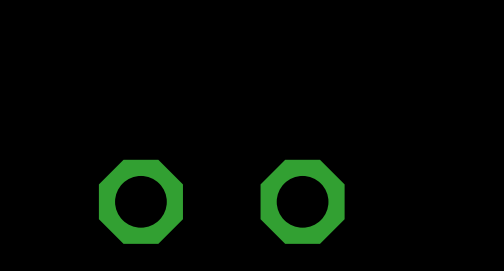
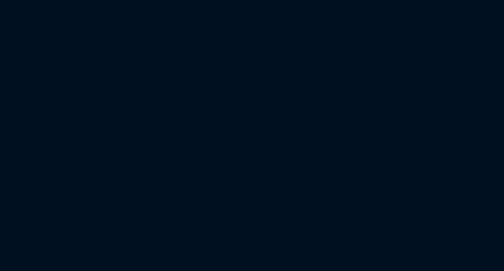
part: (221, 201) -> none

